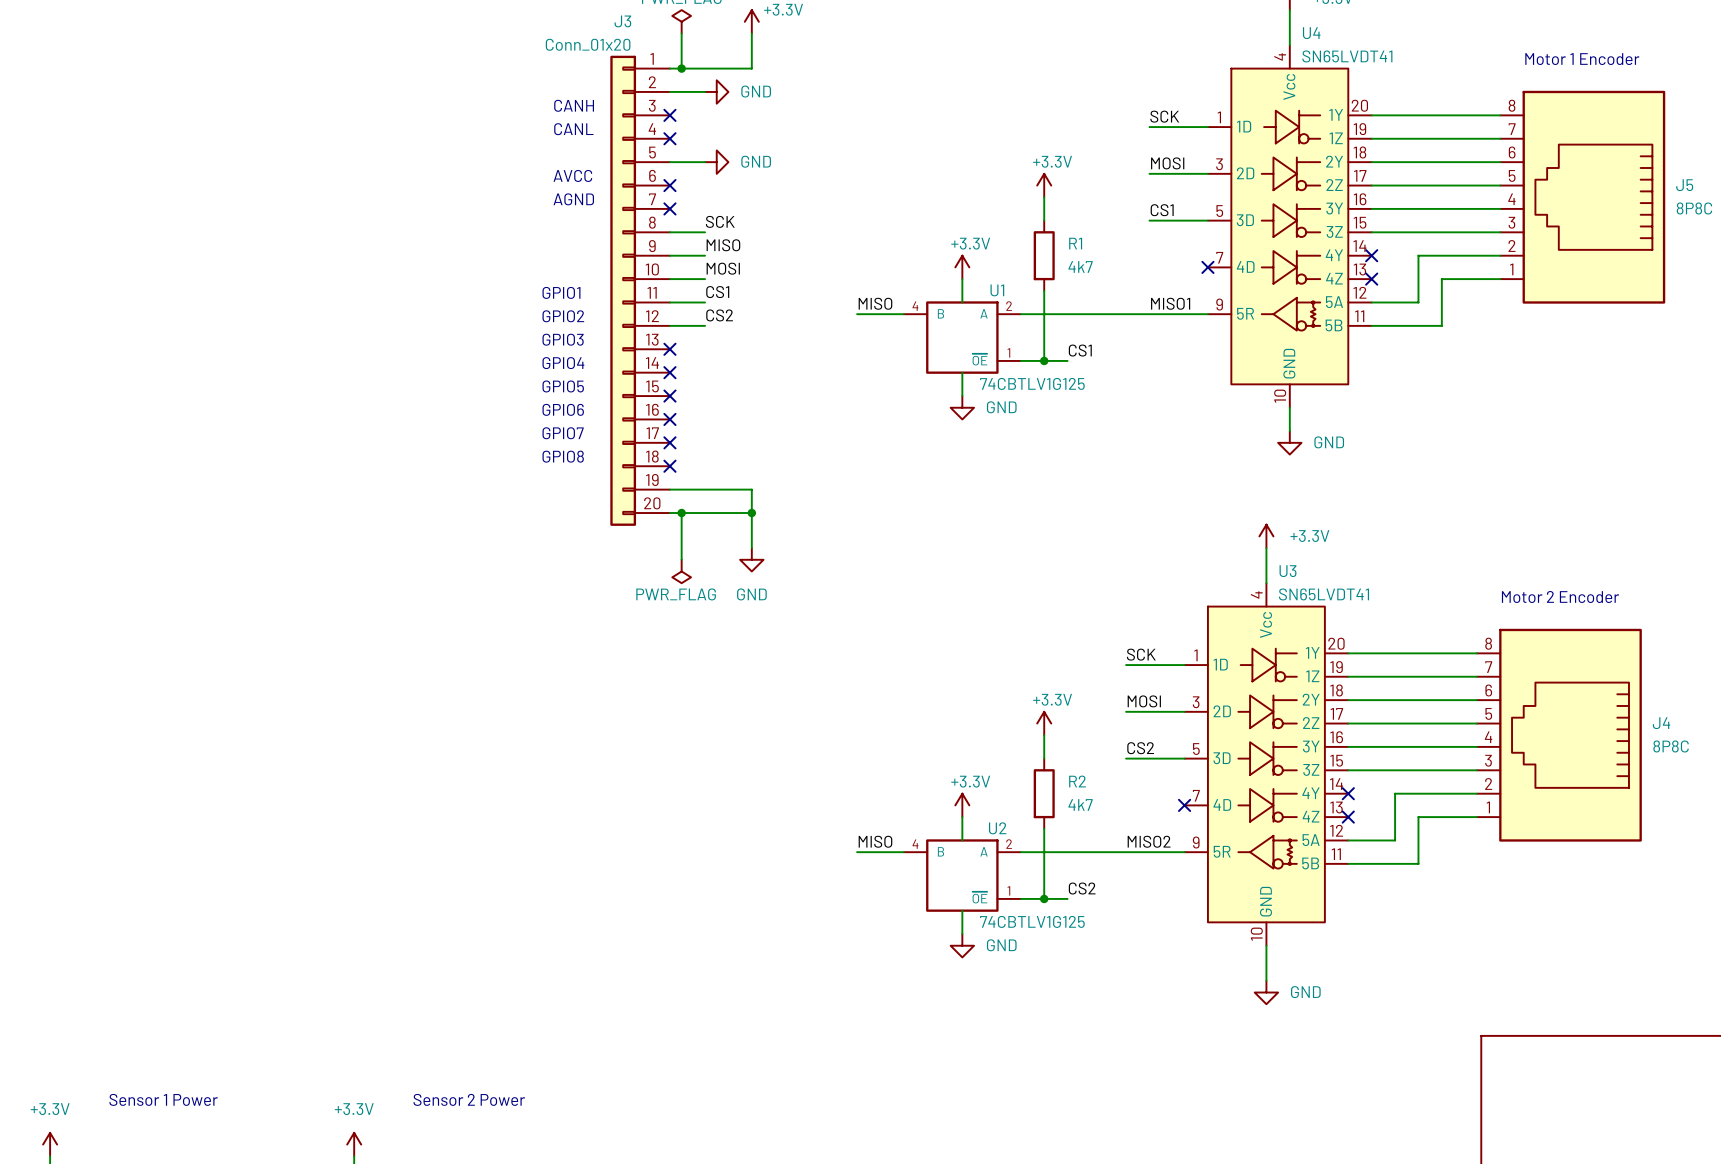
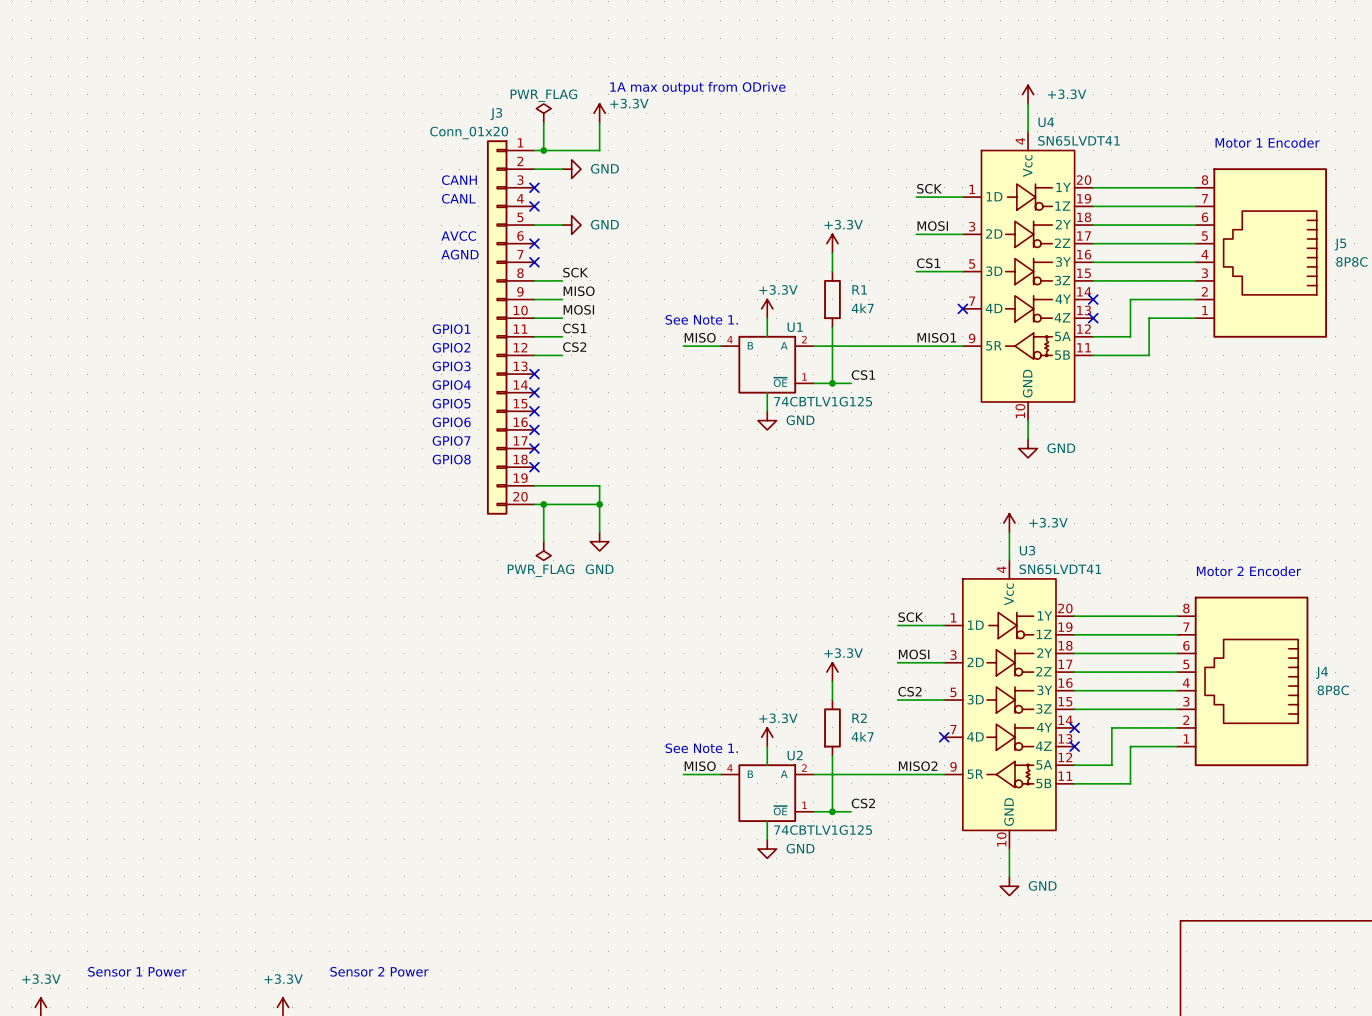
text: none -> See Note 1. (701, 319)
text: none -> See Note 1. (701, 748)

